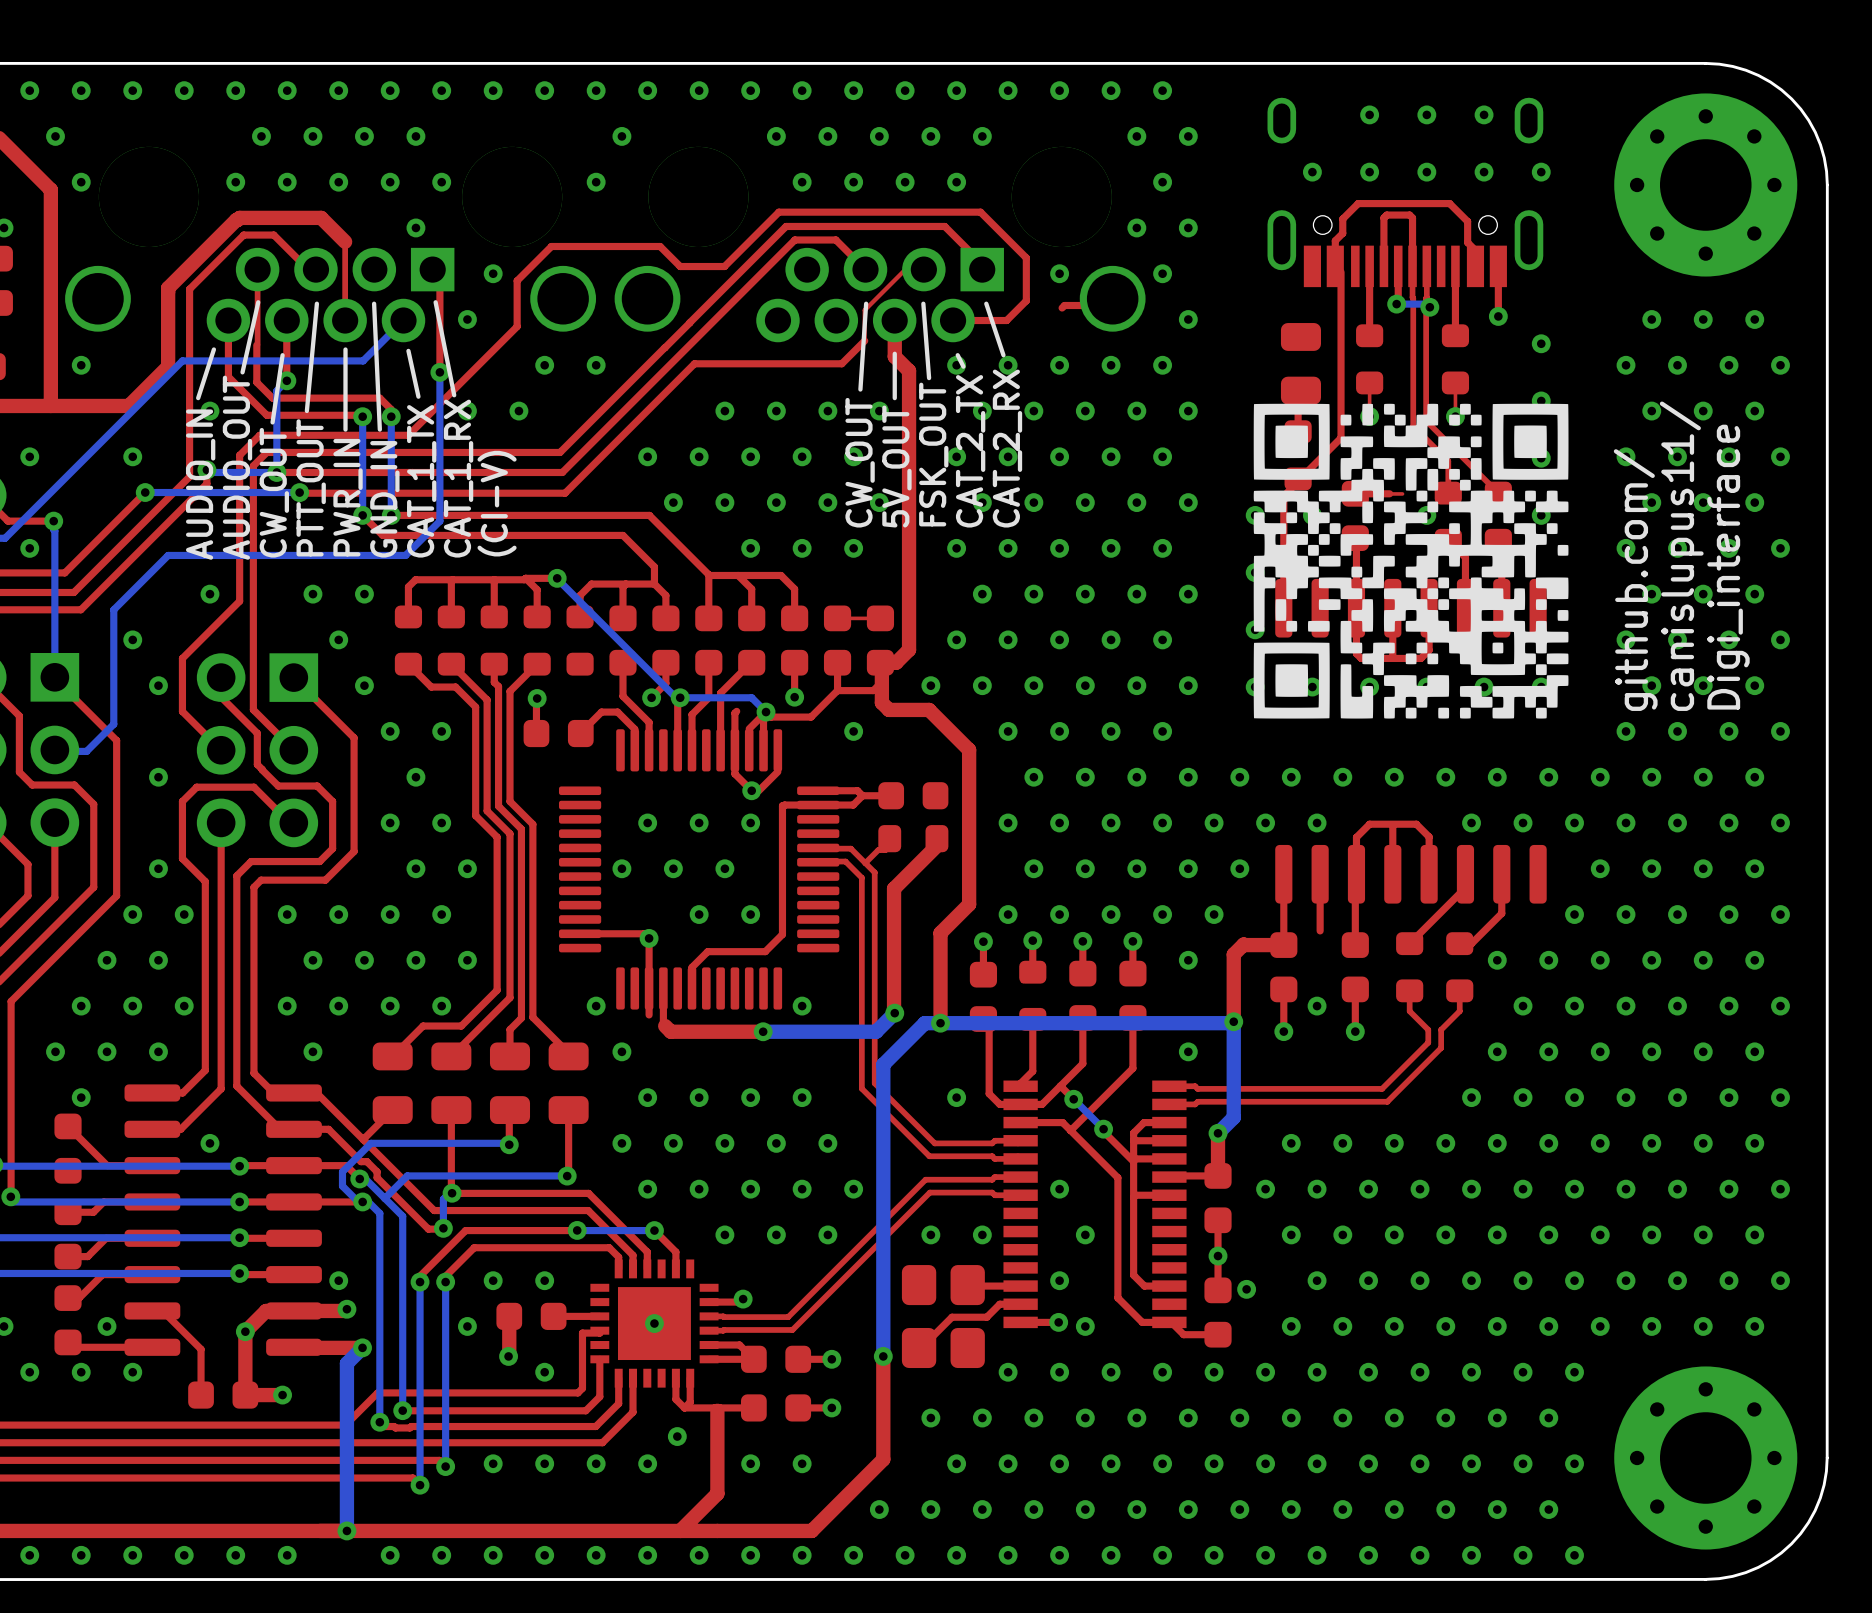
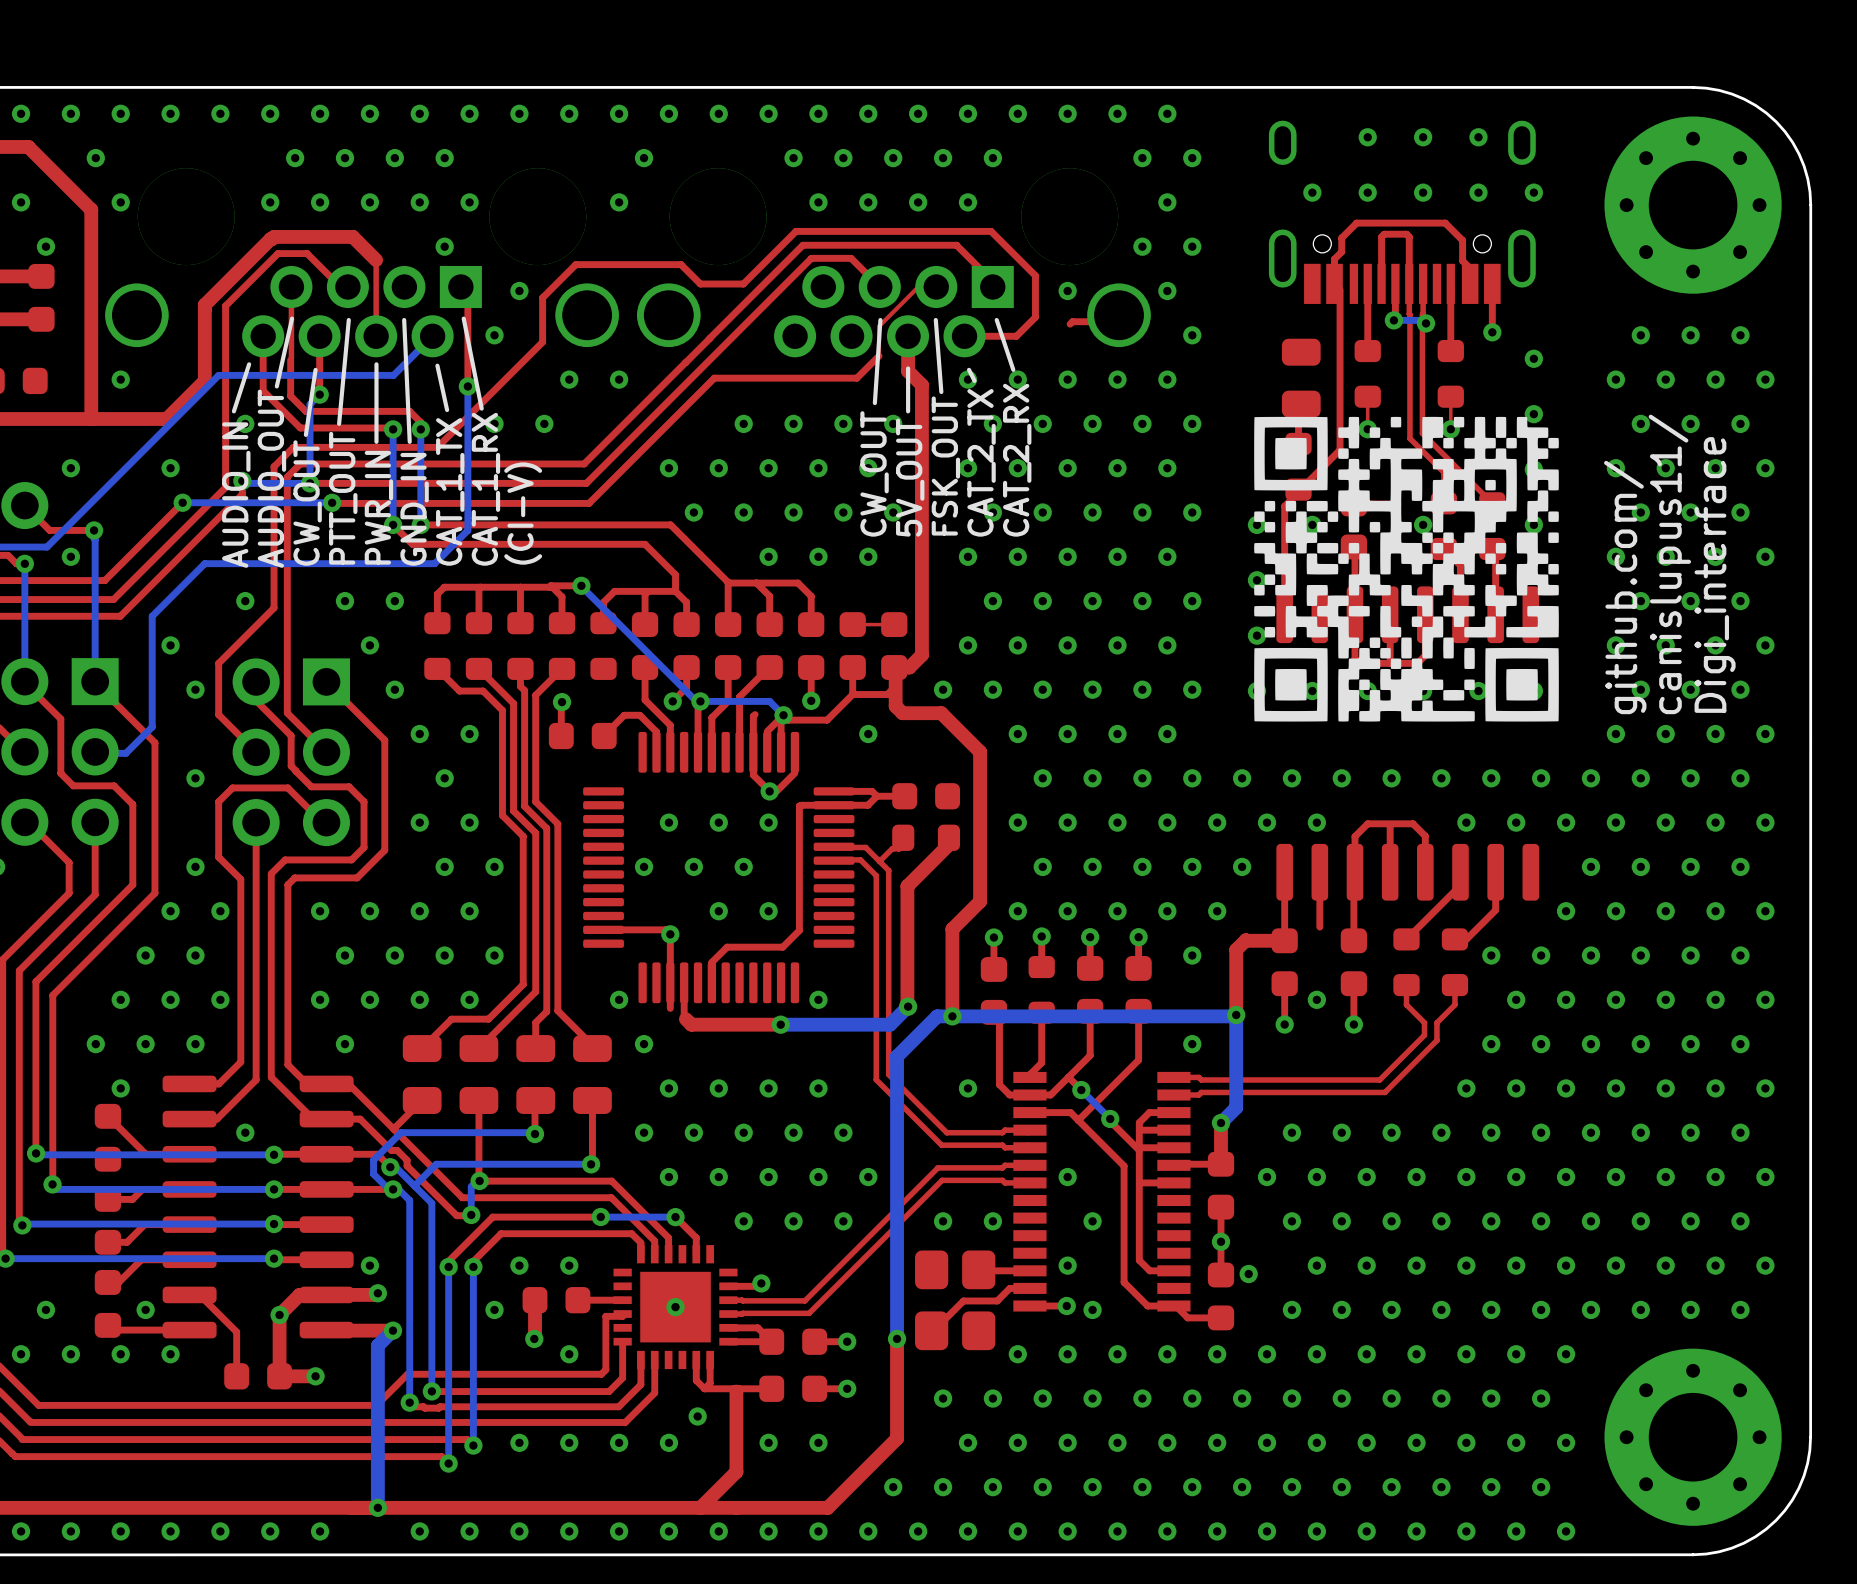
drawing shape: [1253, 403, 1569, 719] -> [1254, 416, 1559, 722]

